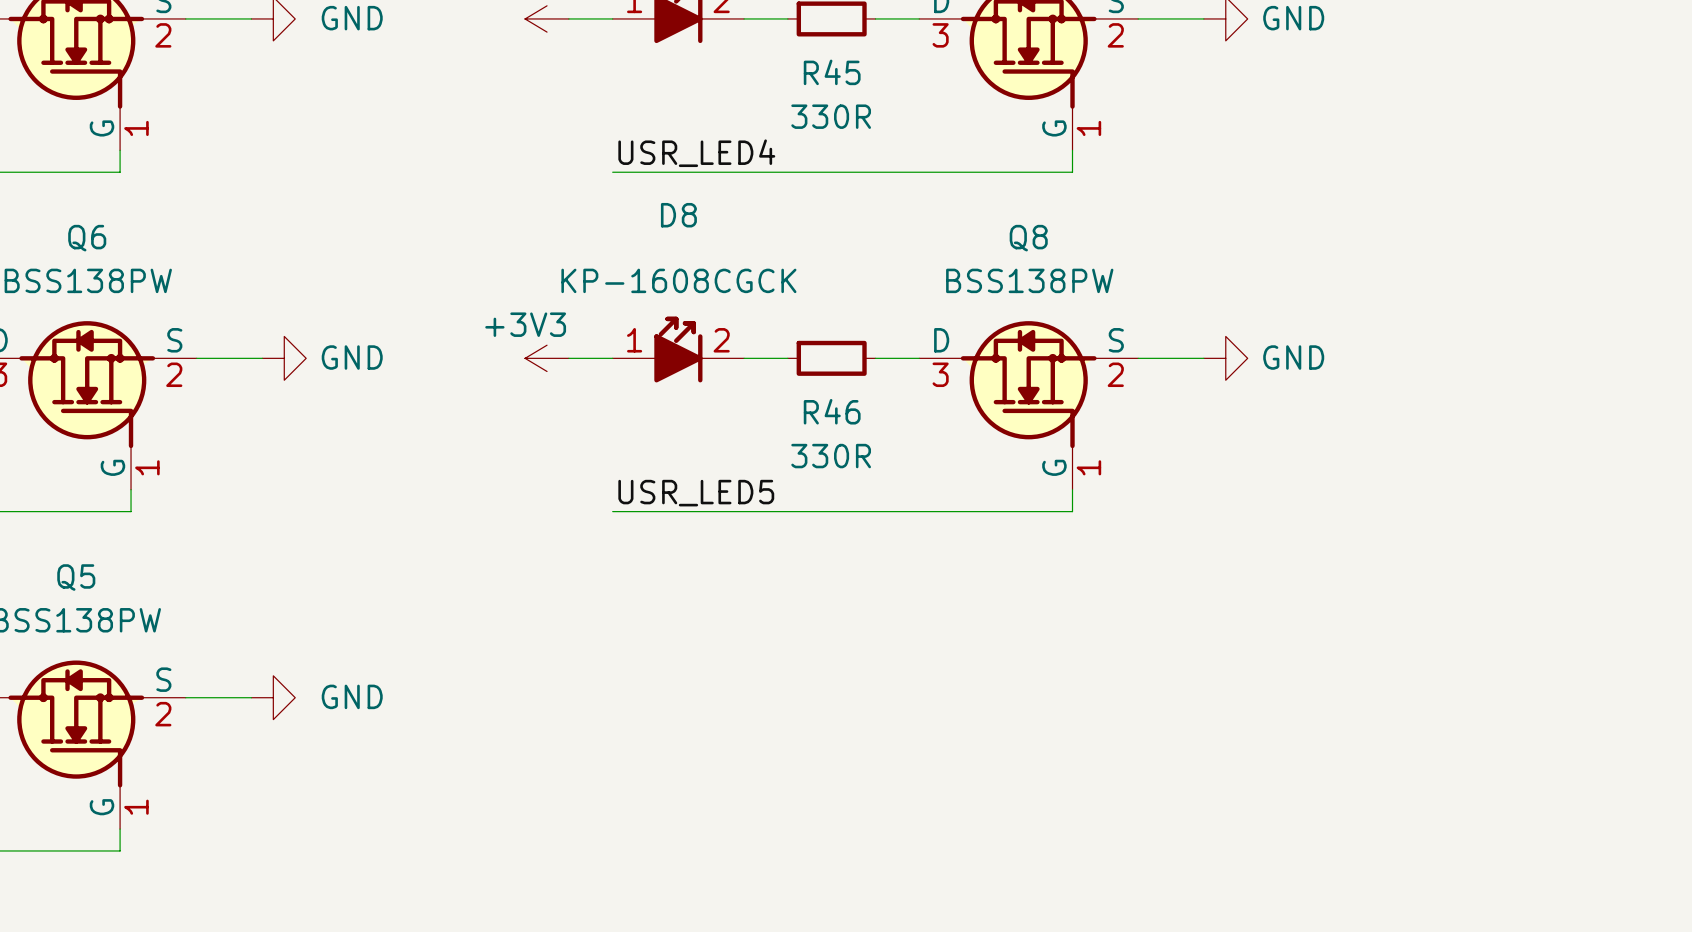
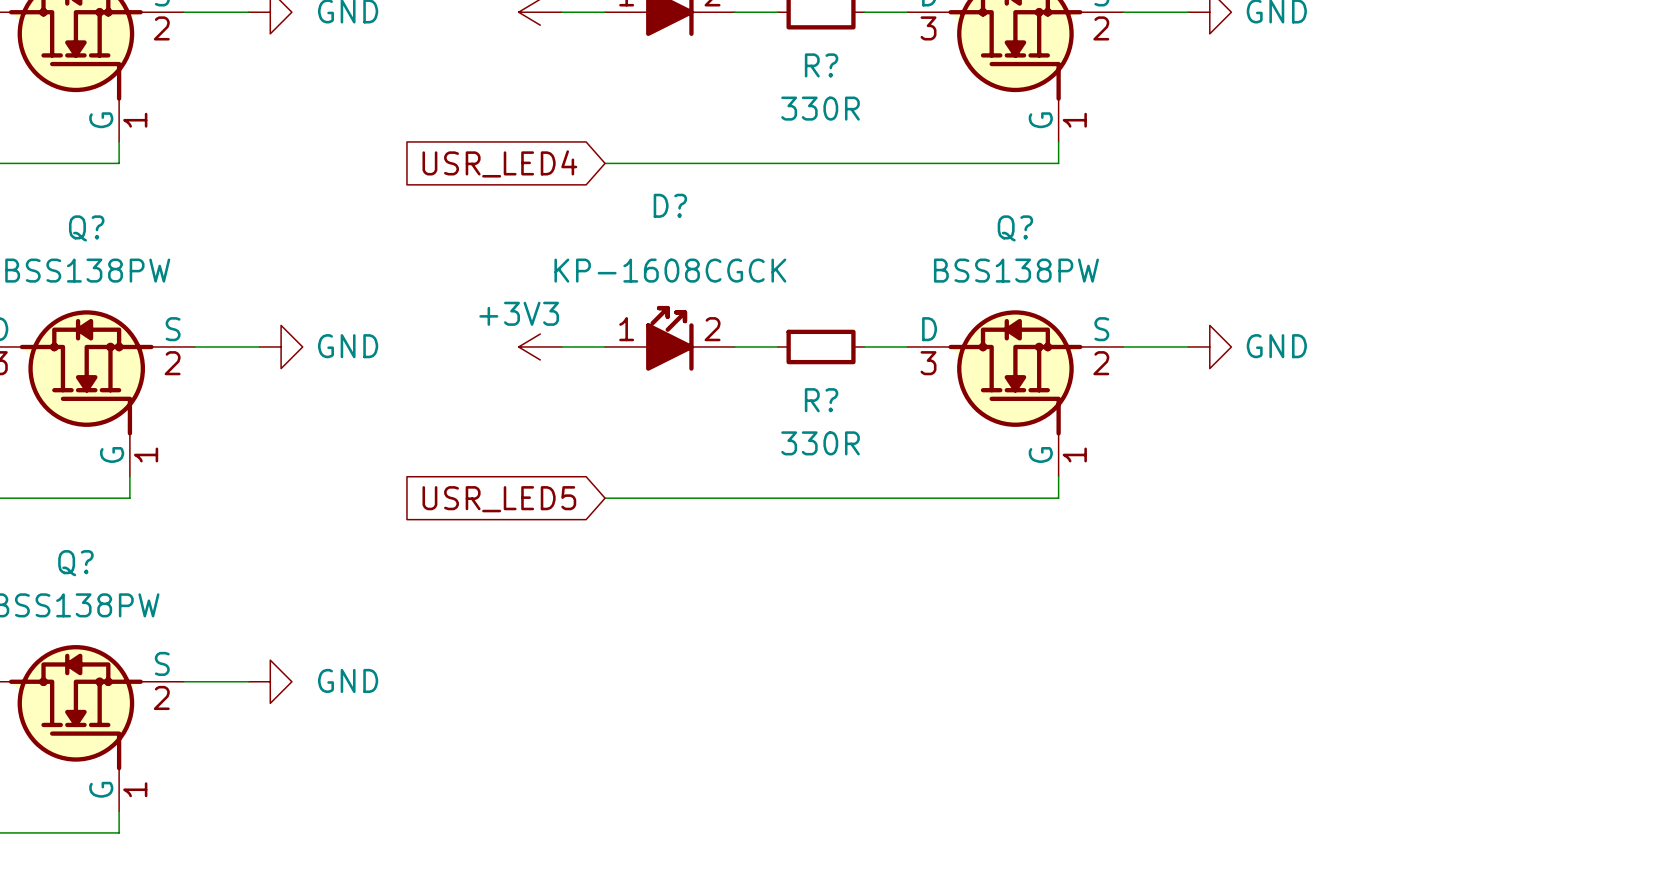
R45 name: R45 (832, 72) -> R? (821, 65)
label: USR_LED4 (696, 153) -> none
global label: none -> USR_LED4 (499, 163)
D8 name: D8 (678, 215) -> D? (670, 205)
Q6 name: Q6 (87, 238) -> Q? (86, 228)
Q8 name: Q8 (1028, 238) -> Q? (1015, 228)
R46 name: R46 (832, 411) -> R? (821, 400)
label: USR_LED5 (696, 493) -> none
global label: none -> USR_LED5 (499, 499)
Q5 name: Q5 (76, 577) -> Q? (75, 563)

